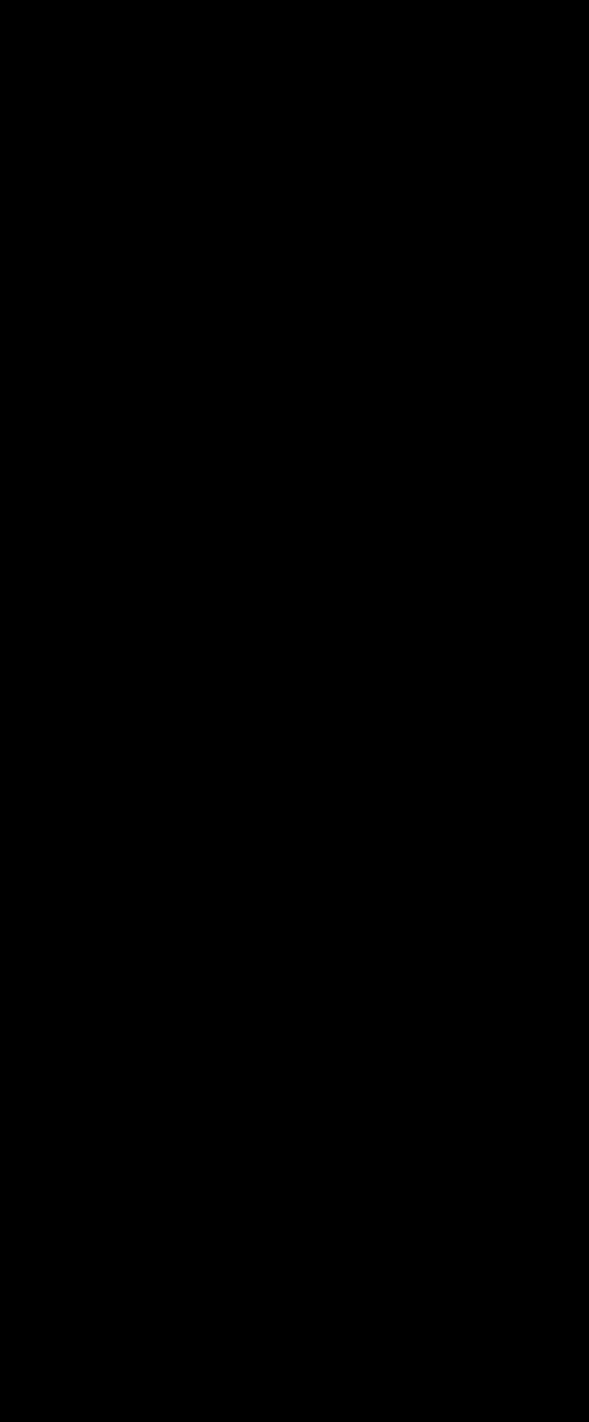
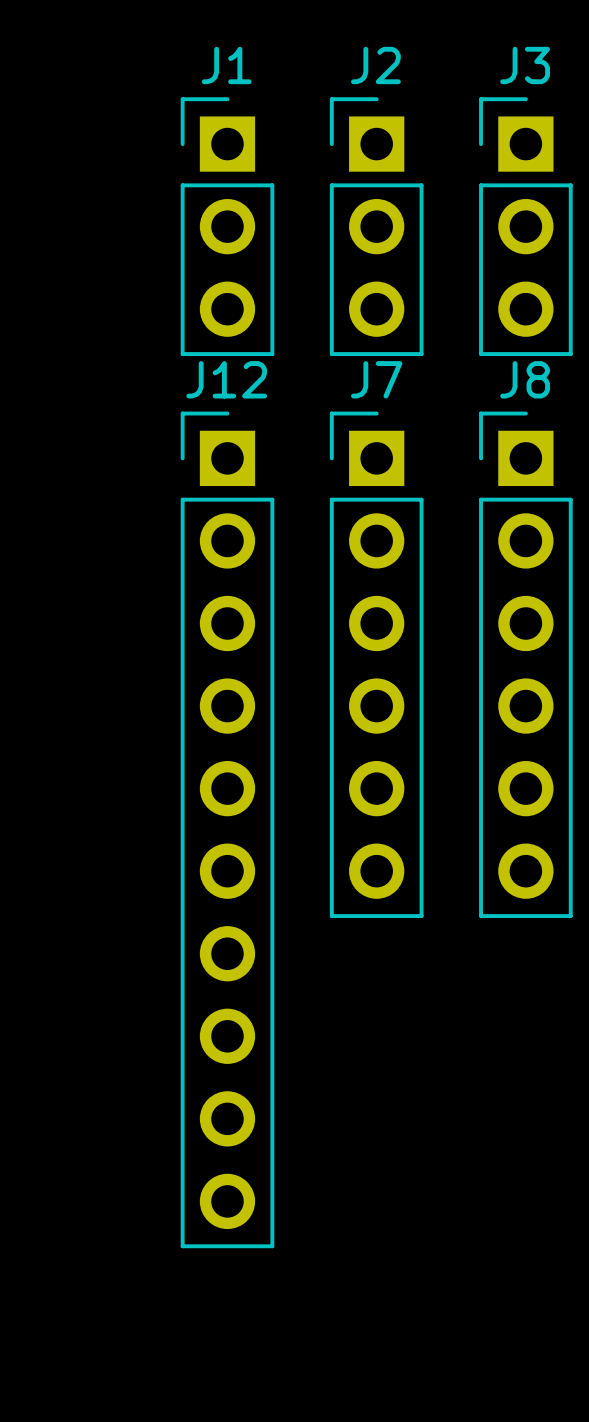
J1: none -> (227, 226)
J2: none -> (376, 226)
J3: none -> (525, 226)
J7: none -> (376, 664)
J8: none -> (525, 664)
J12: none -> (227, 829)

